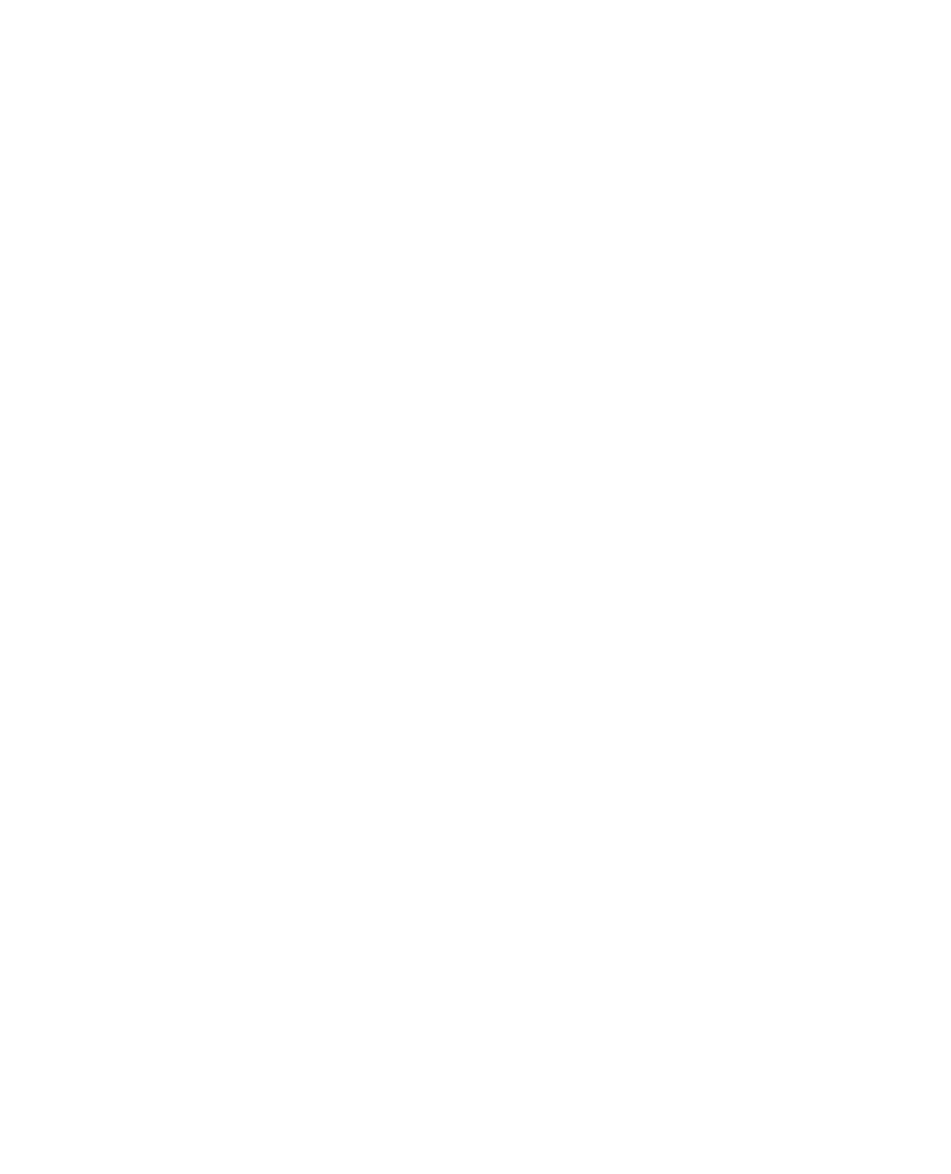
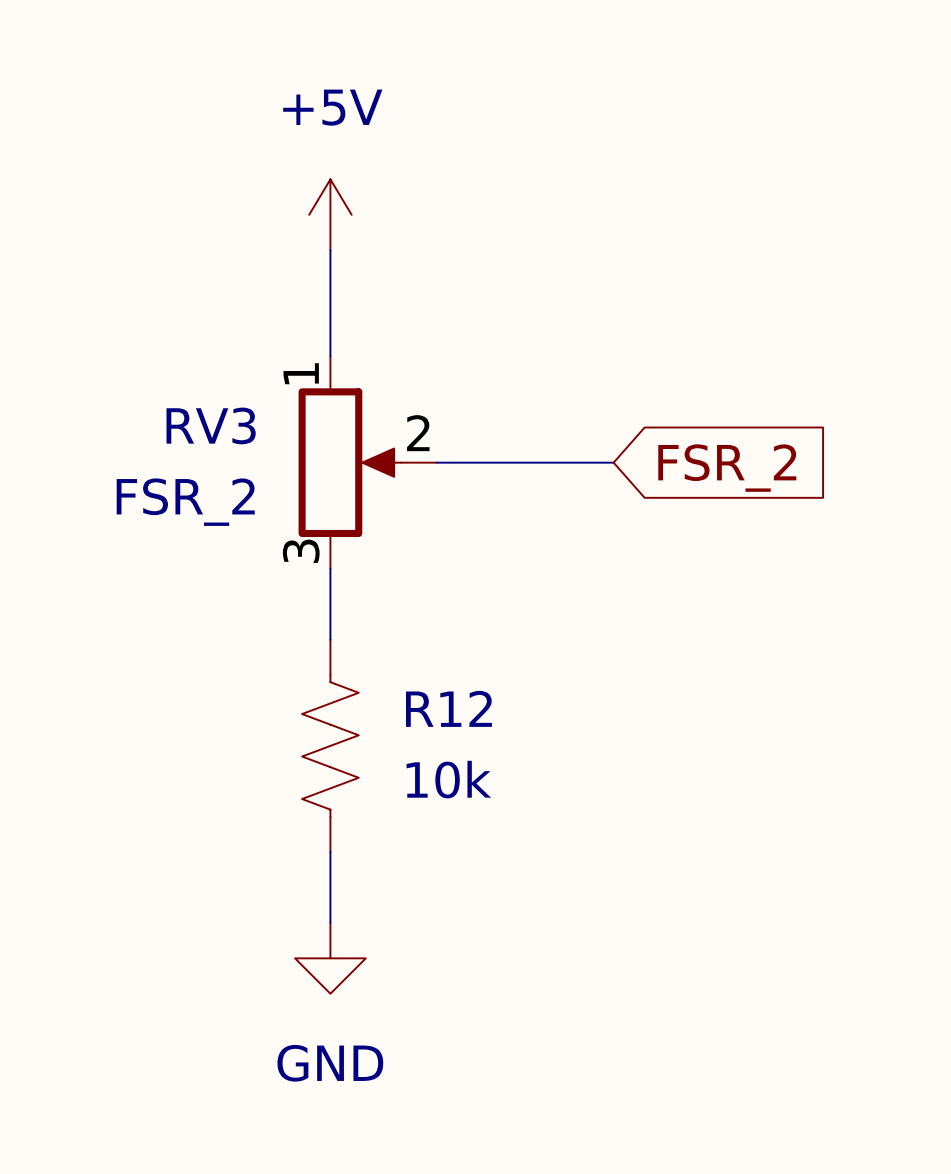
power symbol: none -> +5V (330, 214)
wire: none -> (330, 250) (330, 356)
RV3: none -> FSR_2 (367, 462)
wire: none -> (436, 462) (613, 462)
global label: none -> FSR_2 (727, 468)
wire: none -> (330, 568) (330, 639)
R12: none -> 10k (330, 745)
wire: none -> (330, 852) (330, 922)
power symbol: none -> GND (330, 958)

